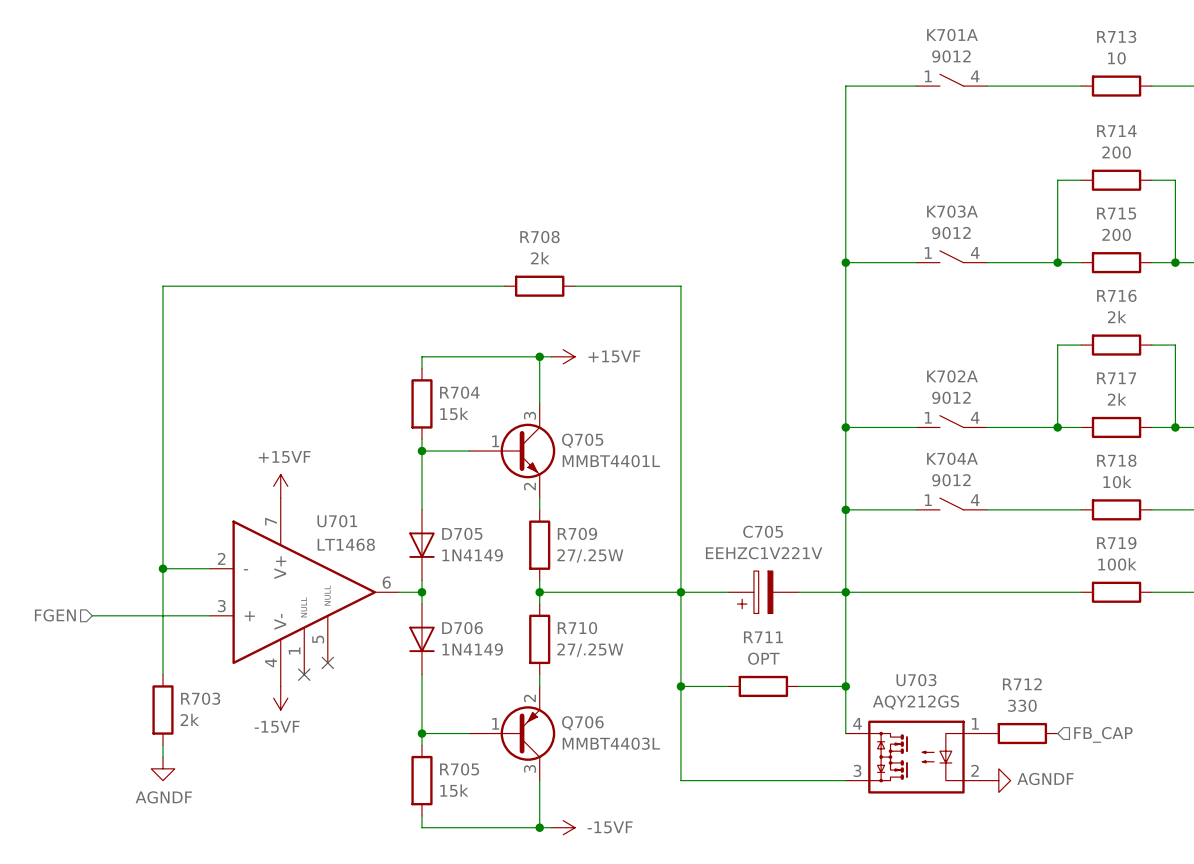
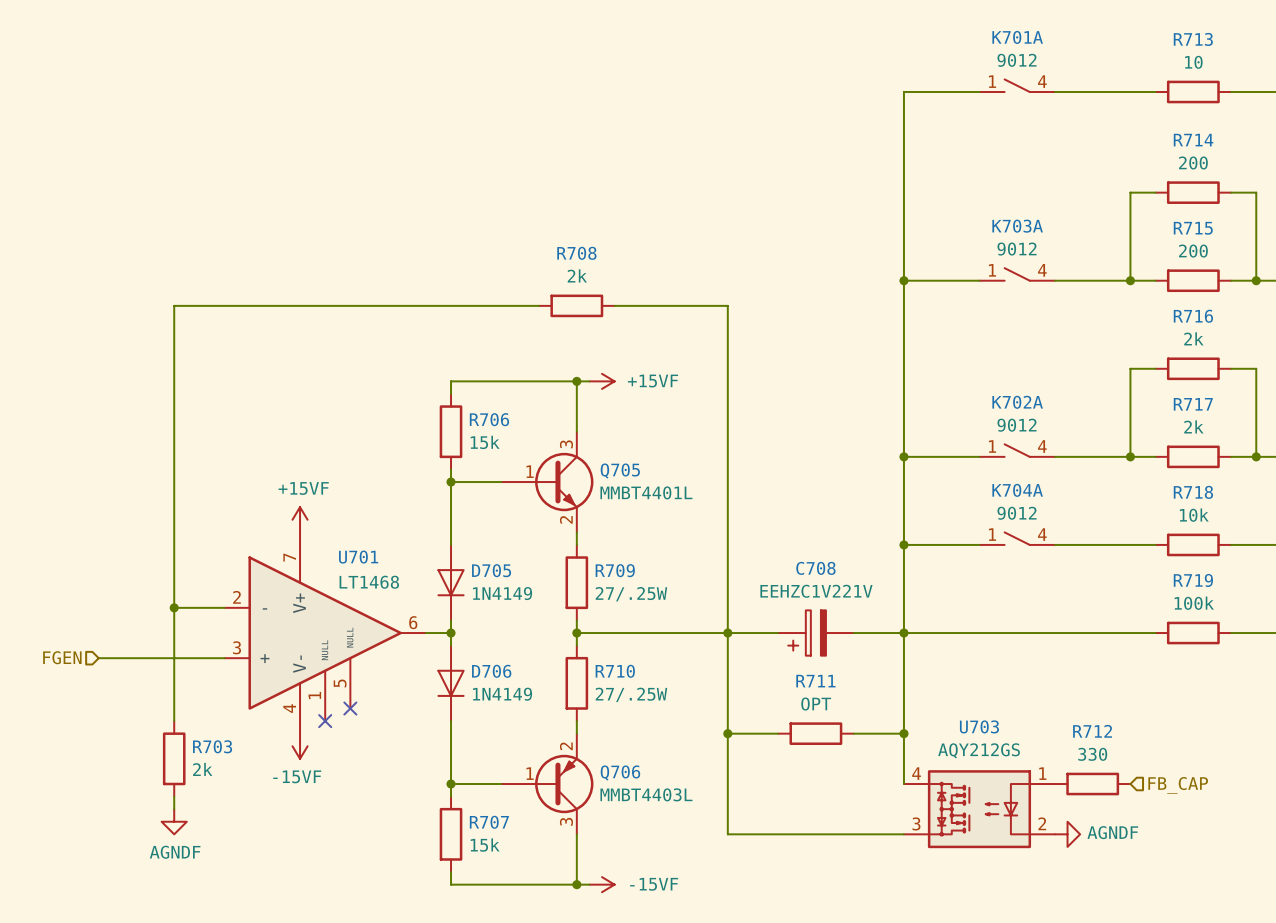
R704 name: R704 (459, 392) -> R706 (489, 419)
C705 name: C705 (763, 531) -> C708 (815, 568)
R705 name: R705 (459, 769) -> R707 (489, 822)

